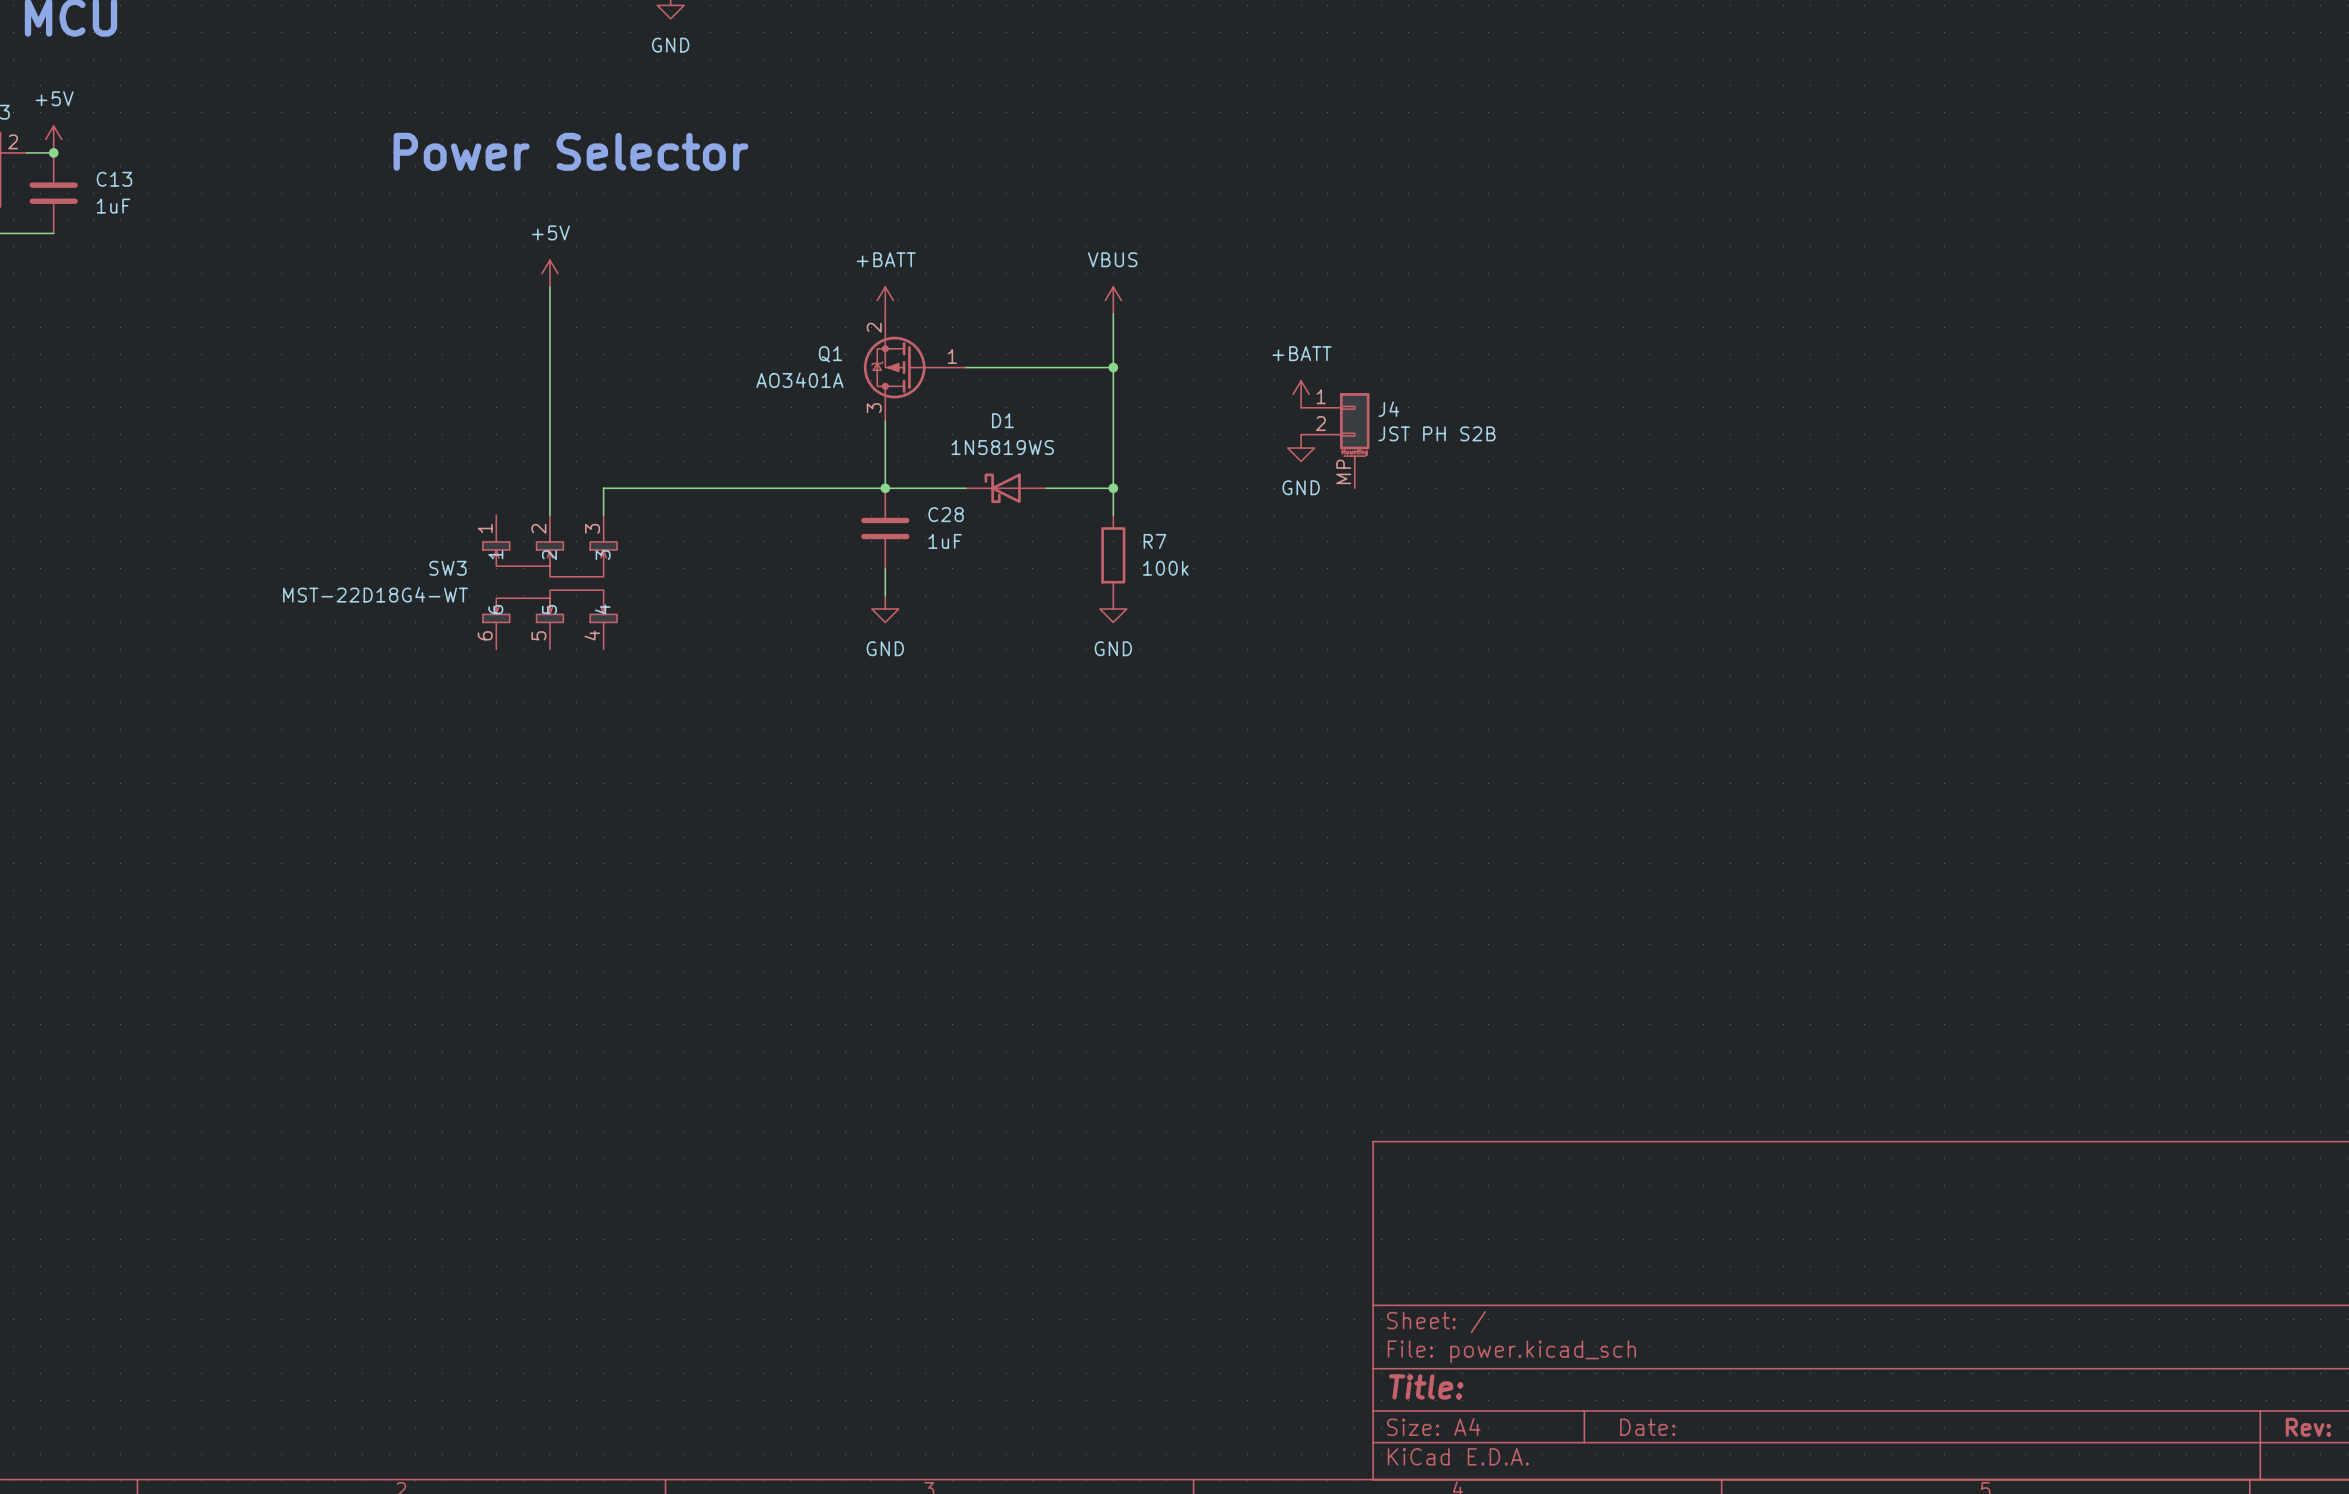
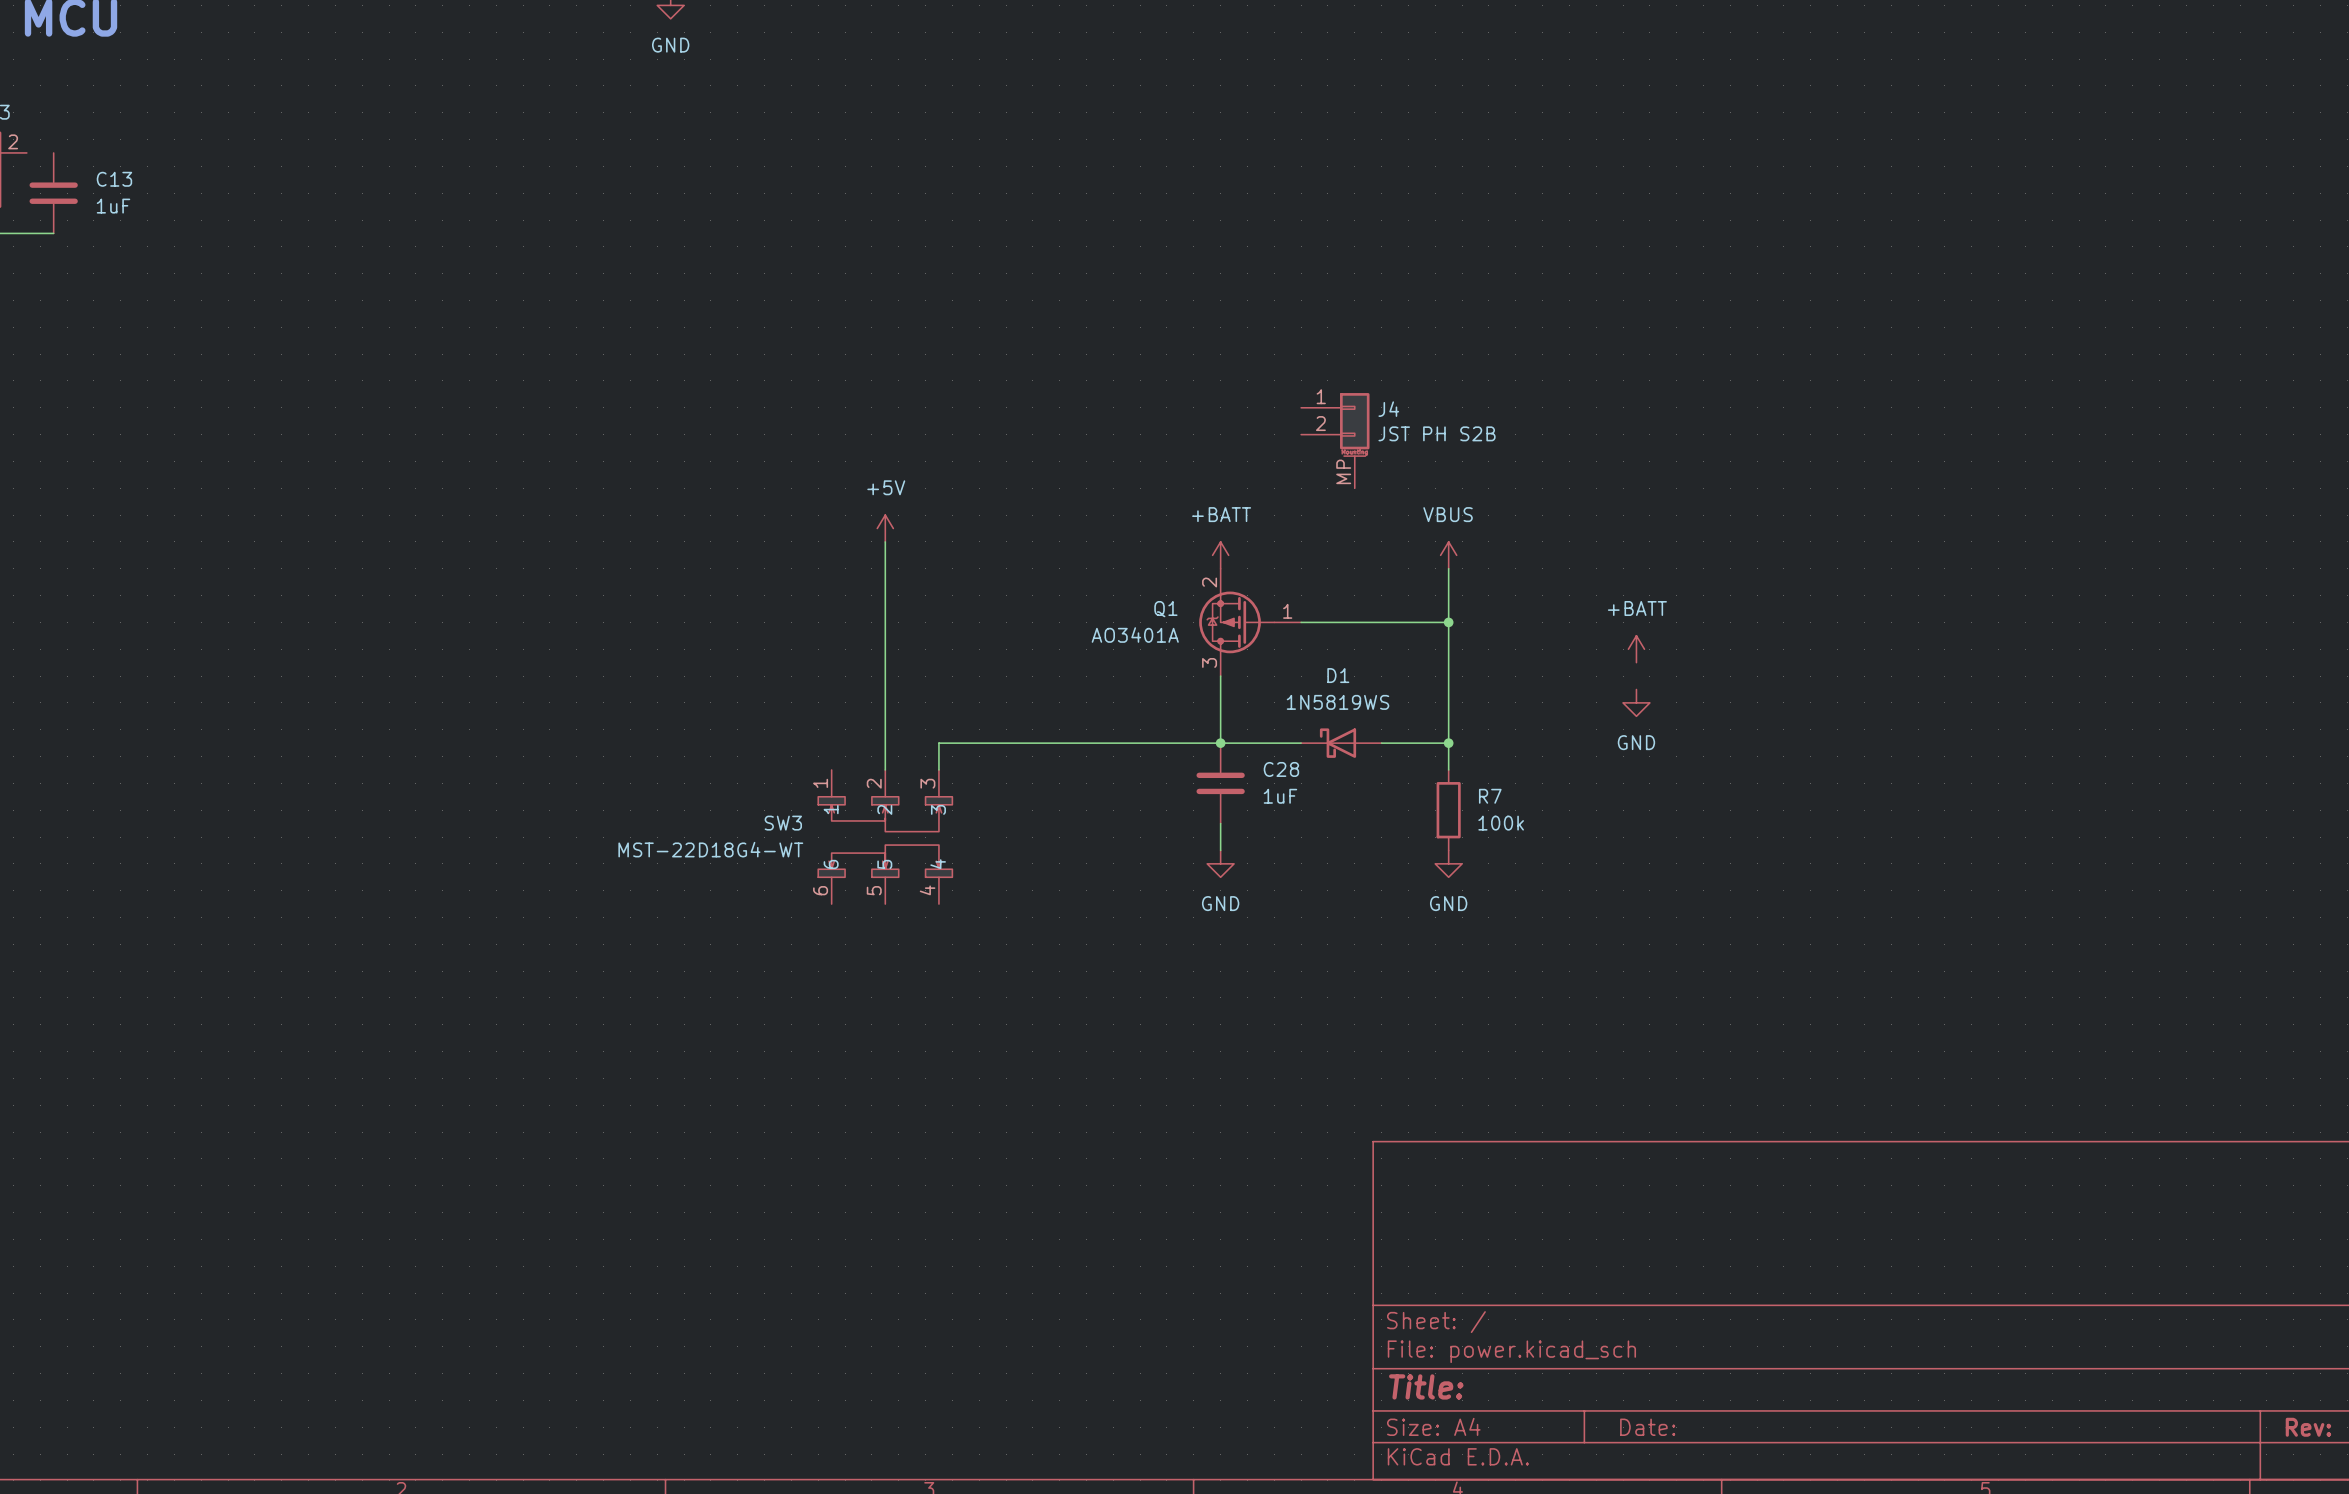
power symbol: +5V (53, 139) -> none
text: Power Selector (571, 151) -> none
wire: (26, 152) (53, 152) -> none
junction: (53, 152) -> none
power symbol: +5V (549, 273) -> none
wire: (549, 287) (549, 515) -> none
power symbol: +BATT (885, 300) -> none
power symbol: VBUS (1113, 300) -> none
wire: (1113, 313) (1113, 515) -> none
Q1 position: (914, 367) -> (1250, 622)
wire: (965, 367) (1113, 367) -> none
junction: (1113, 367) -> none
power symbol position: +BATT (1301, 394) -> +BATT (1220, 555)
wire: (885, 421) (885, 488) -> none
power symbol: GND (1301, 448) -> none
junction: (885, 488) -> none
wire: (965, 488) (603, 488) (603, 515) -> none
D1 position: (1006, 488) -> (1341, 743)
wire: (1046, 488) (1113, 488) -> none
junction: (1113, 488) -> none
C28 position: (885, 528) -> (1220, 783)
power symbol: none -> +5V (885, 528)
R7 position: (1113, 555) -> (1448, 810)
power symbol: none -> VBUS (1448, 555)
wire: none -> (1448, 568) (1448, 769)
SW3 position: (549, 582) -> (885, 837)
wire: none -> (885, 595) (885, 769)
power symbol: GND (885, 609) -> none
power symbol: GND (1113, 609) -> none
wire: none -> (1301, 622) (1448, 622)
junction: none -> (1448, 622)
power symbol: none -> +BATT (1636, 649)
wire: none -> (1220, 676) (1220, 743)
power symbol: none -> GND (1636, 702)
junction: none -> (1220, 743)
wire: none -> (1301, 743) (938, 743) (938, 769)
wire: none -> (1381, 743) (1448, 743)
junction: none -> (1448, 743)
wire: none -> (1220, 823) (1220, 850)
power symbol: none -> GND (1220, 863)
power symbol: none -> GND (1448, 863)

